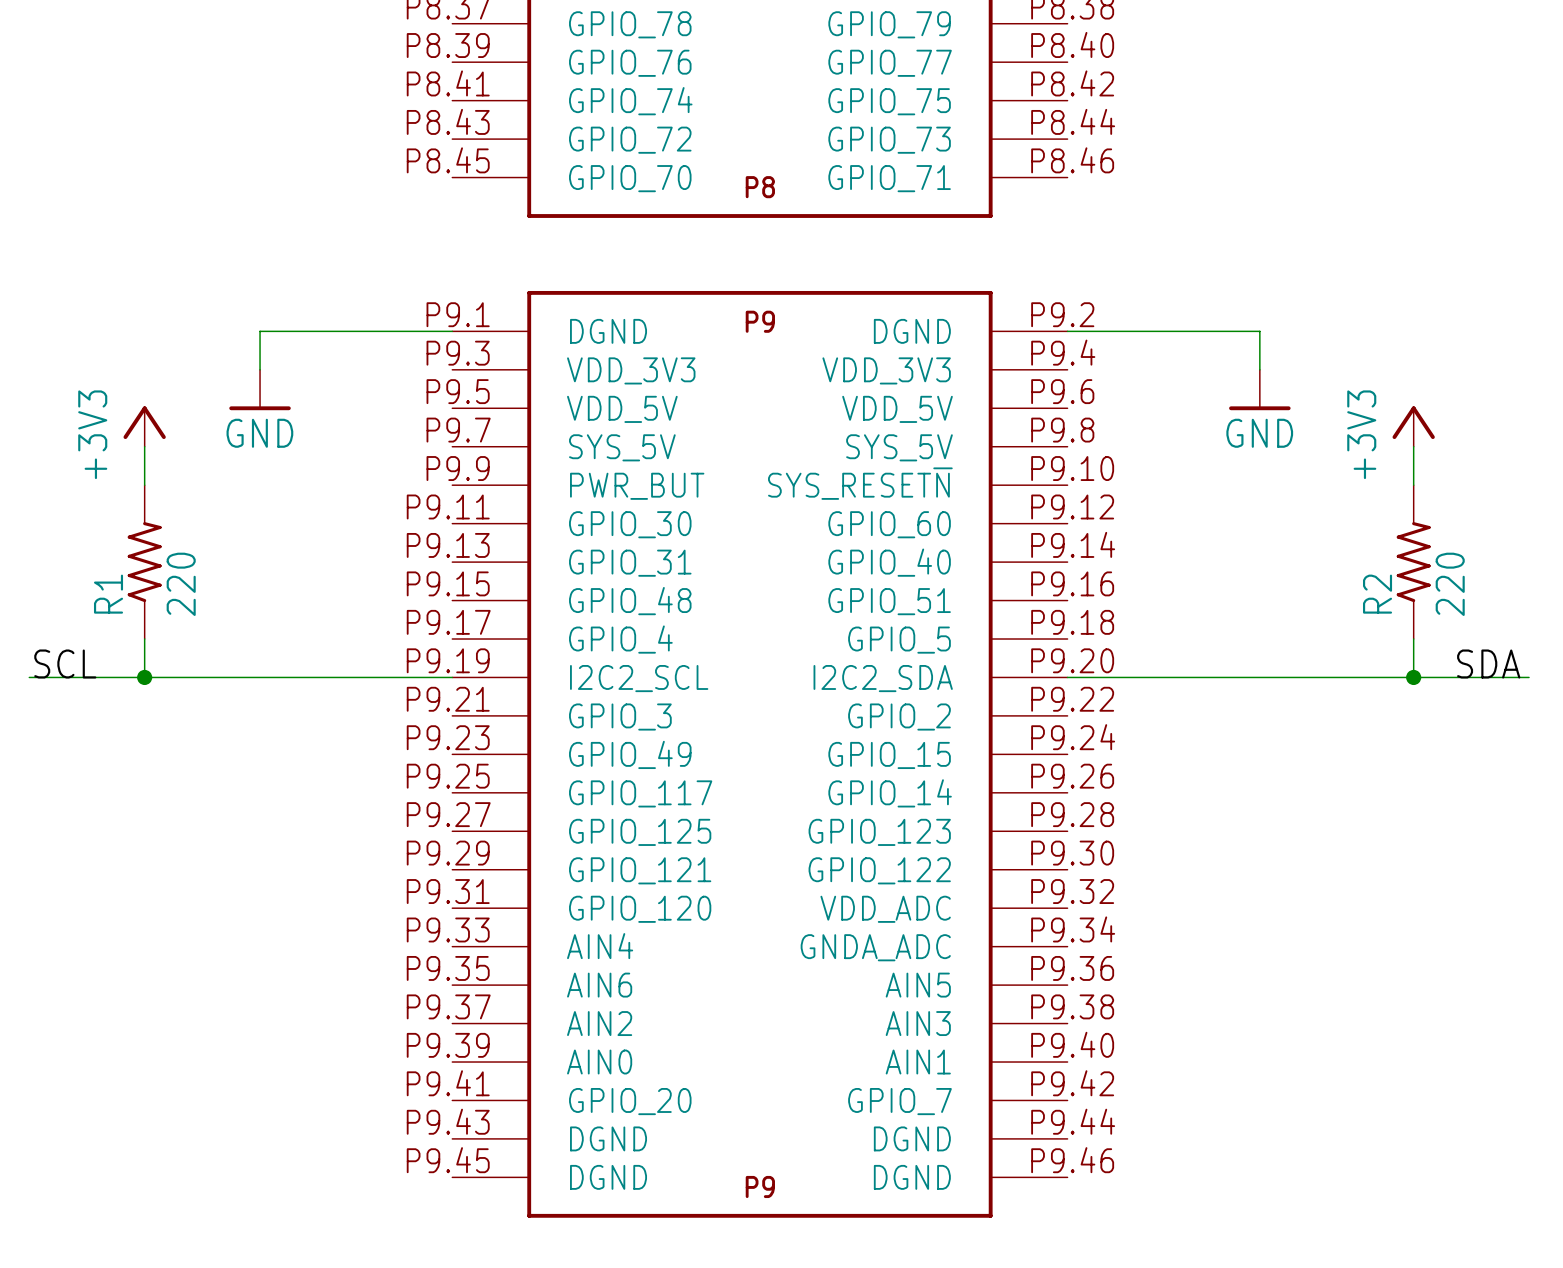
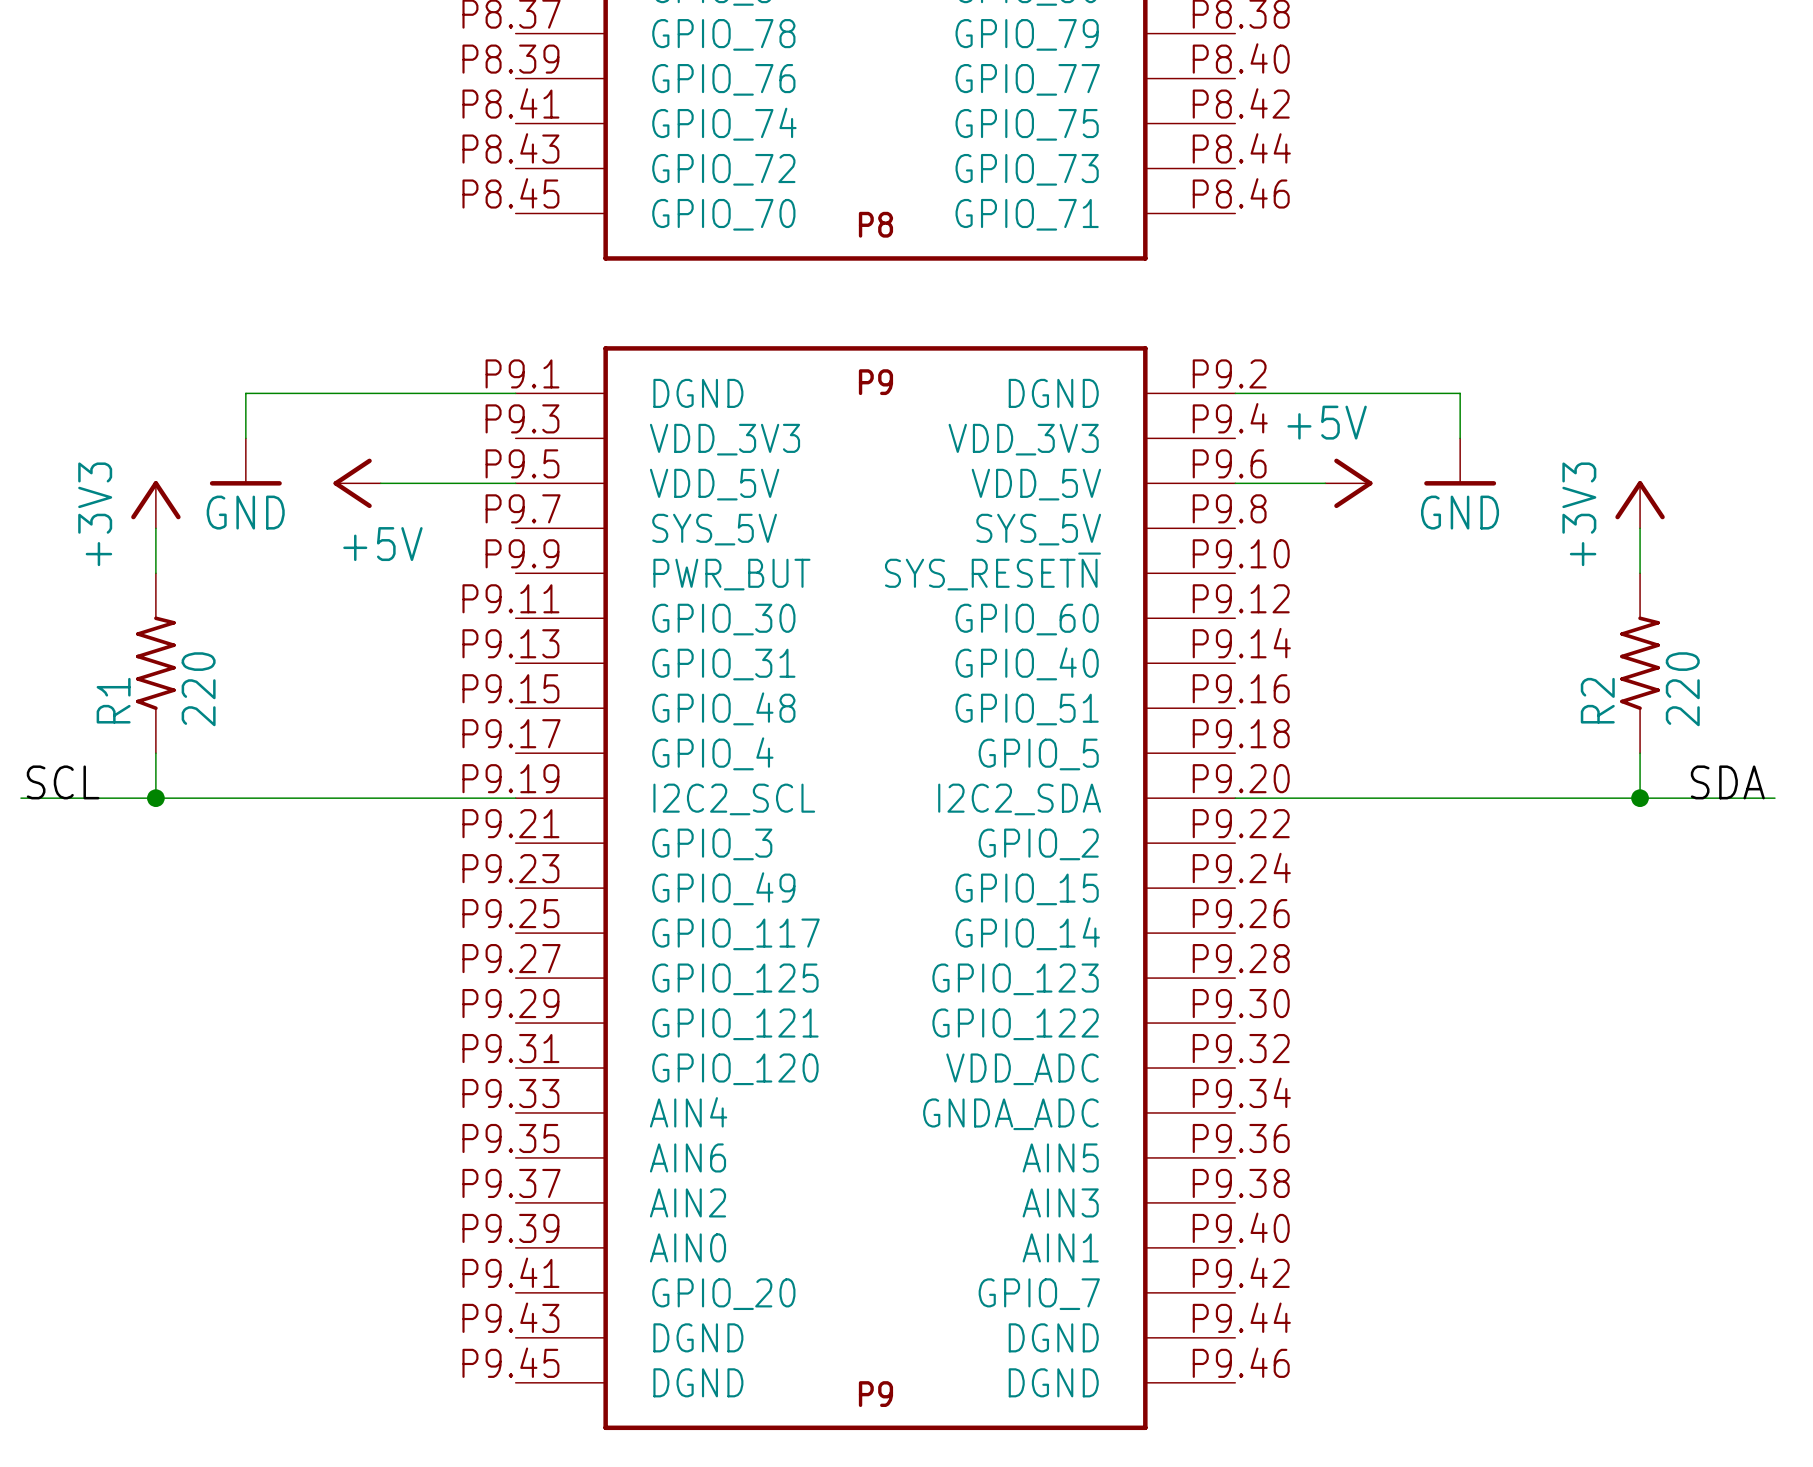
wire: (260, 331) (260, 369) -> (290, 393) (245, 393) (245, 438)
power symbol position: GND (260, 390) -> GND (245, 461)
power symbol: none -> +5V (357, 483)
wire: none -> (380, 483) (515, 483)
wire: none -> (1235, 483) (1325, 483)
power symbol: none -> +5V (1348, 483)

